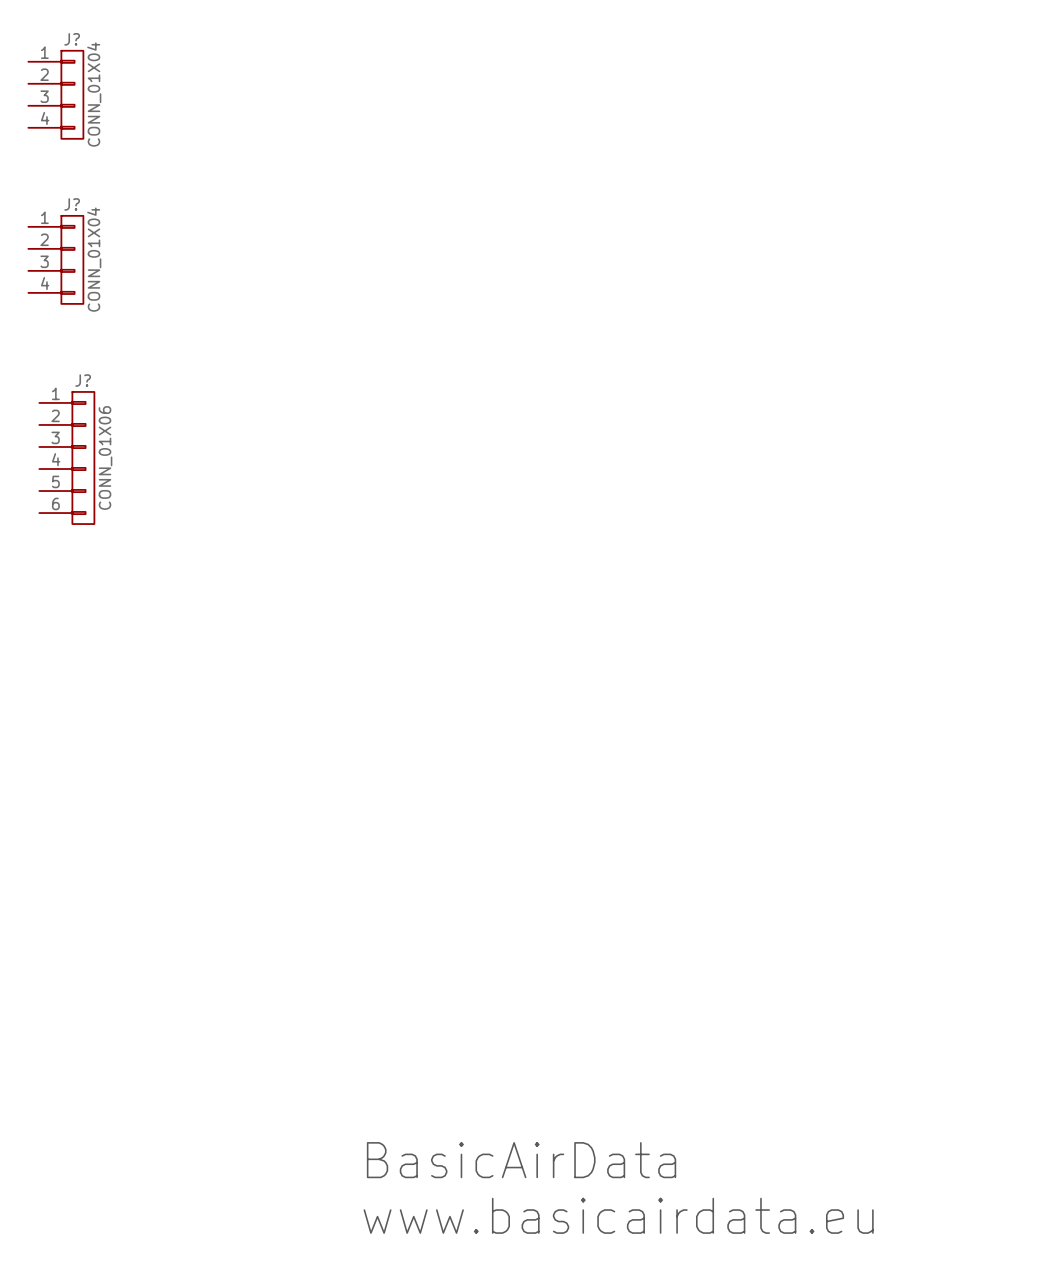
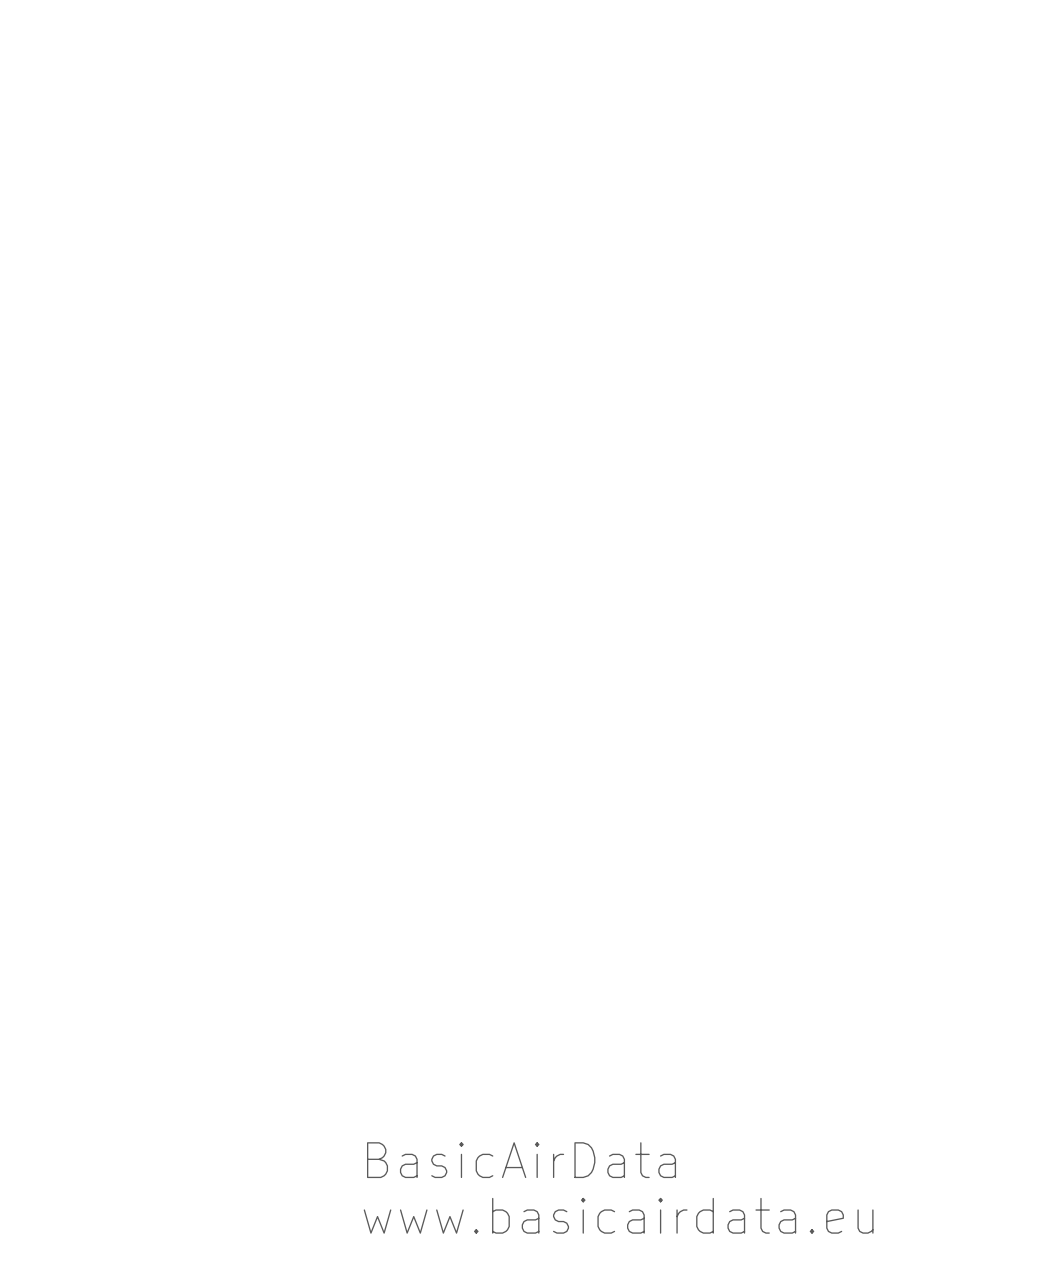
J?: CONN_01X04 (55, 94) -> none
J?: CONN_01X04 (55, 259) -> none
J?: CONN_01X06 (66, 458) -> none

